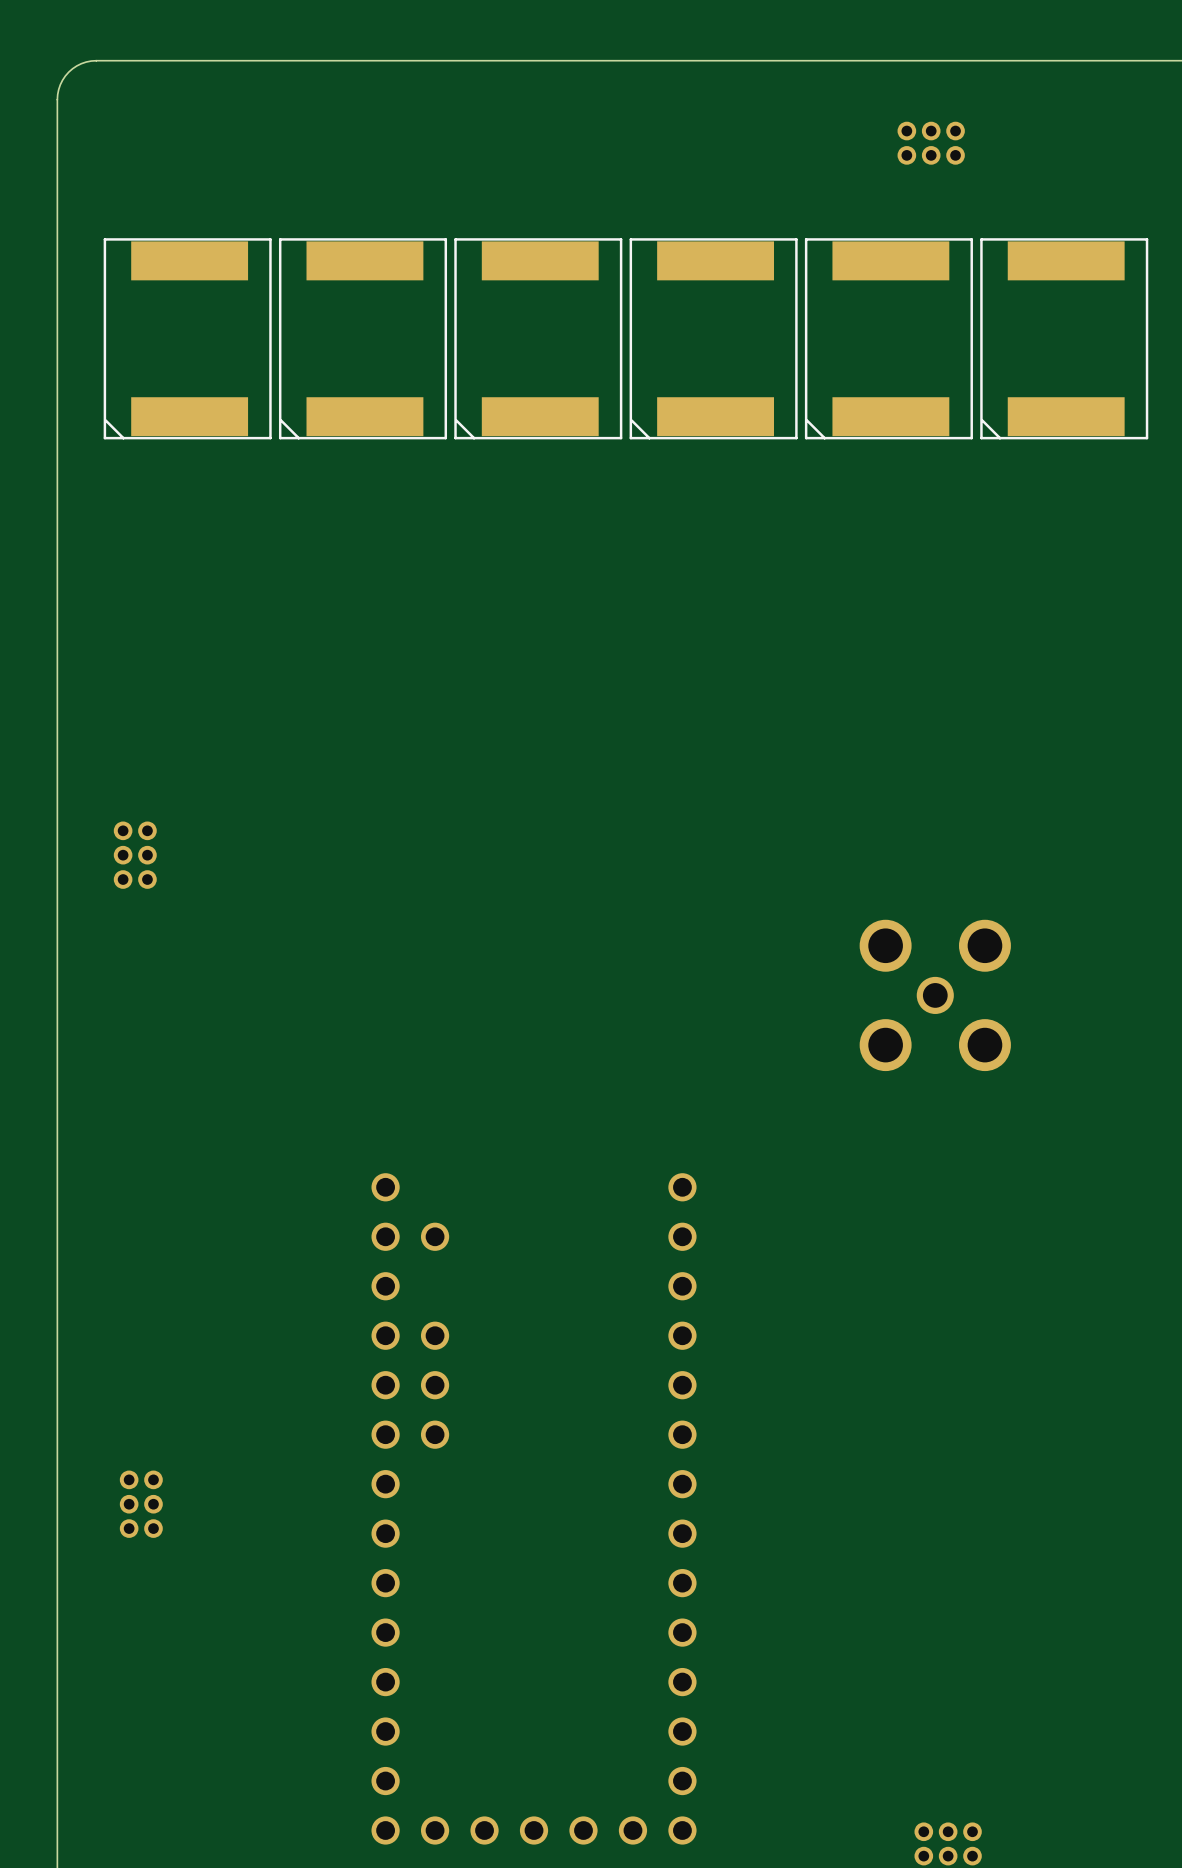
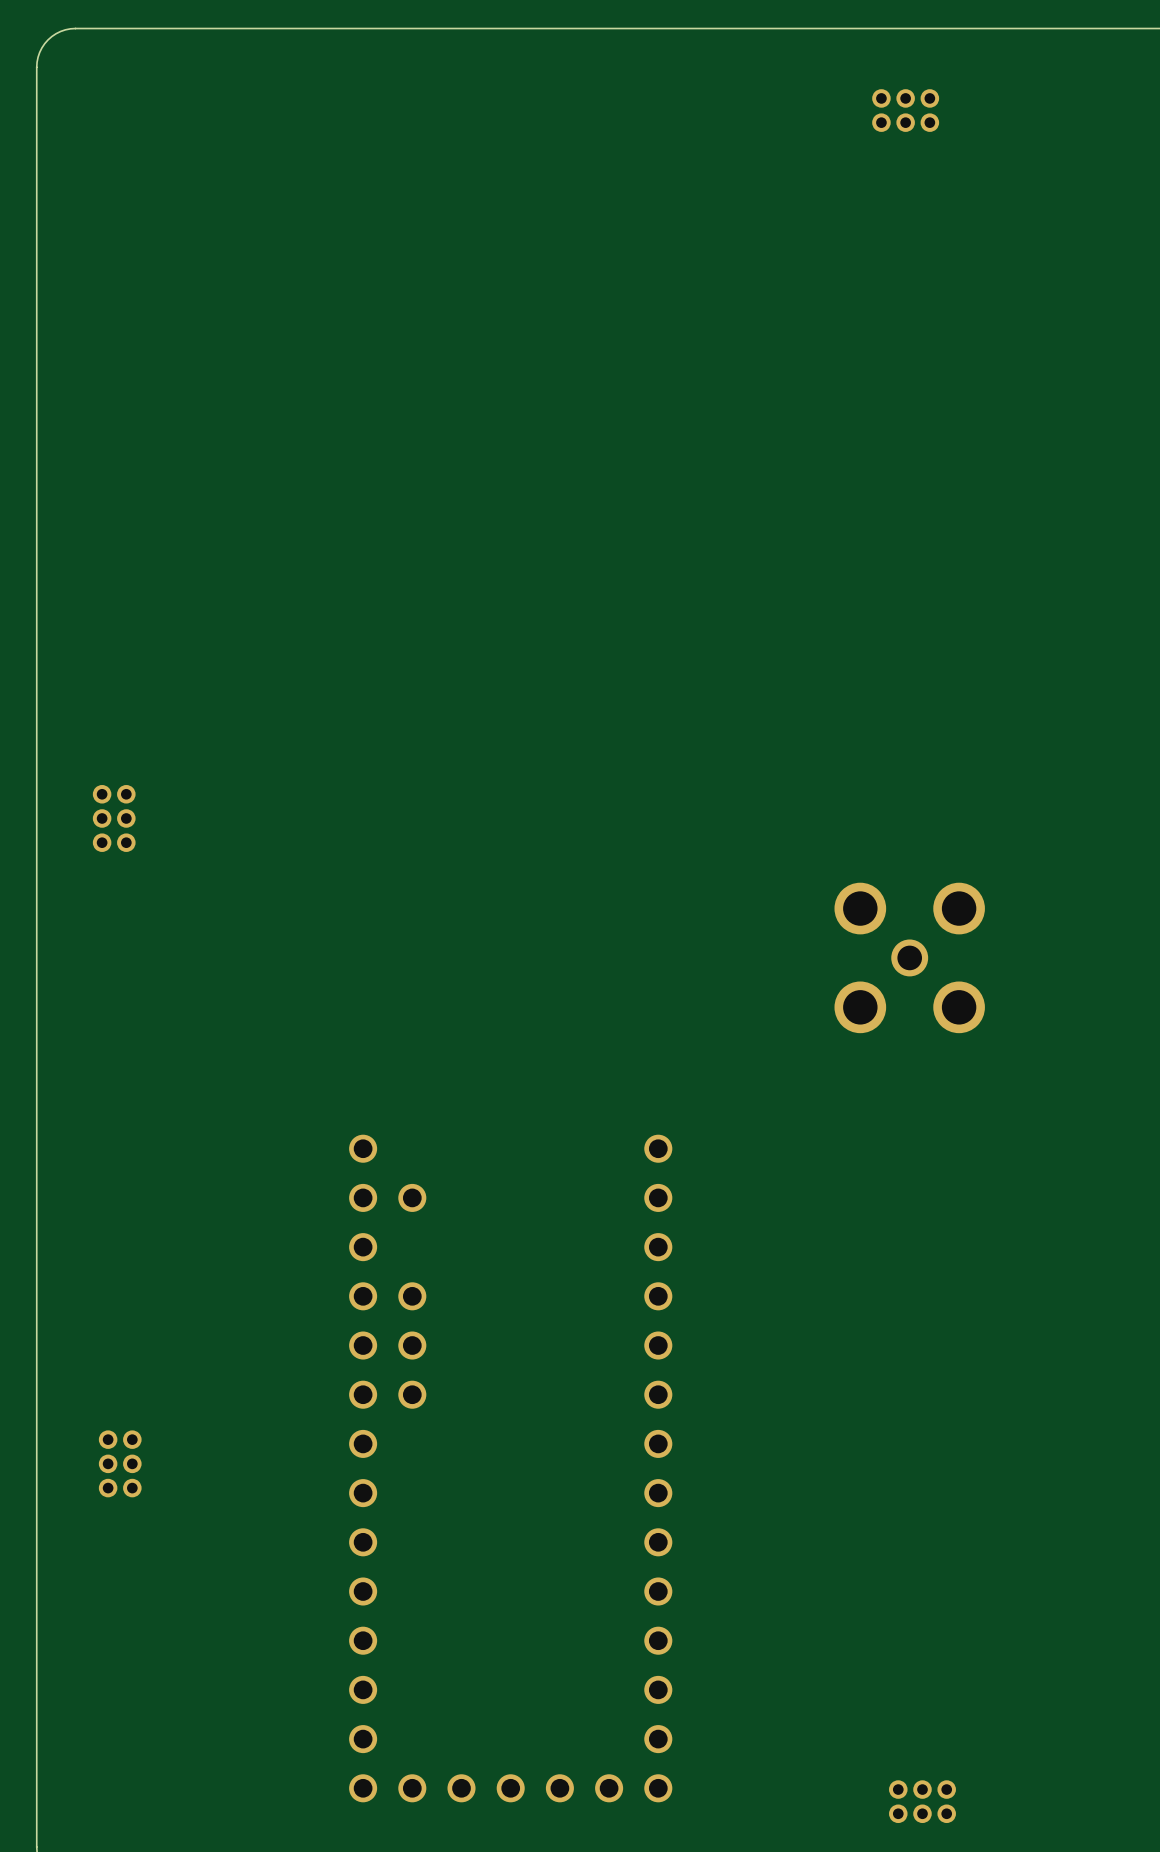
part: (187, 338) -> none
part: (362, 338) -> none
part: (538, 338) -> none
part: (713, 338) -> none
part: (888, 338) -> none
part: (1064, 338) -> none

